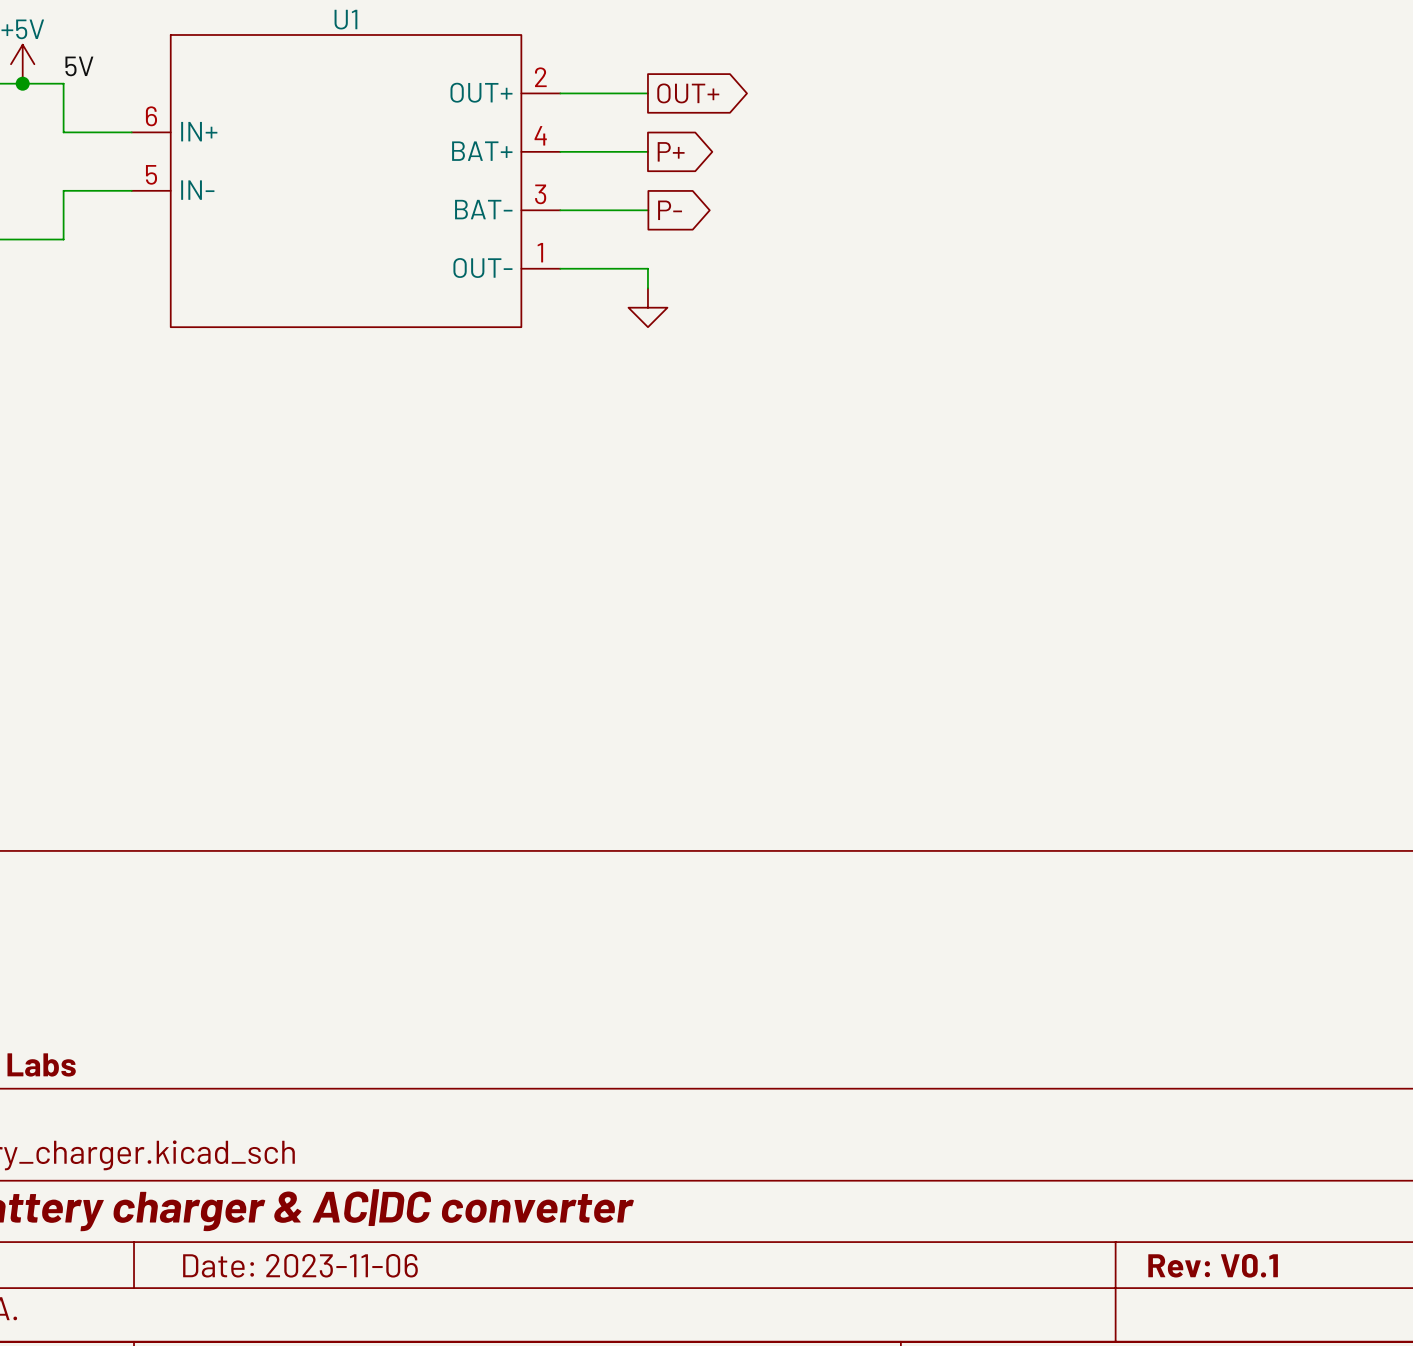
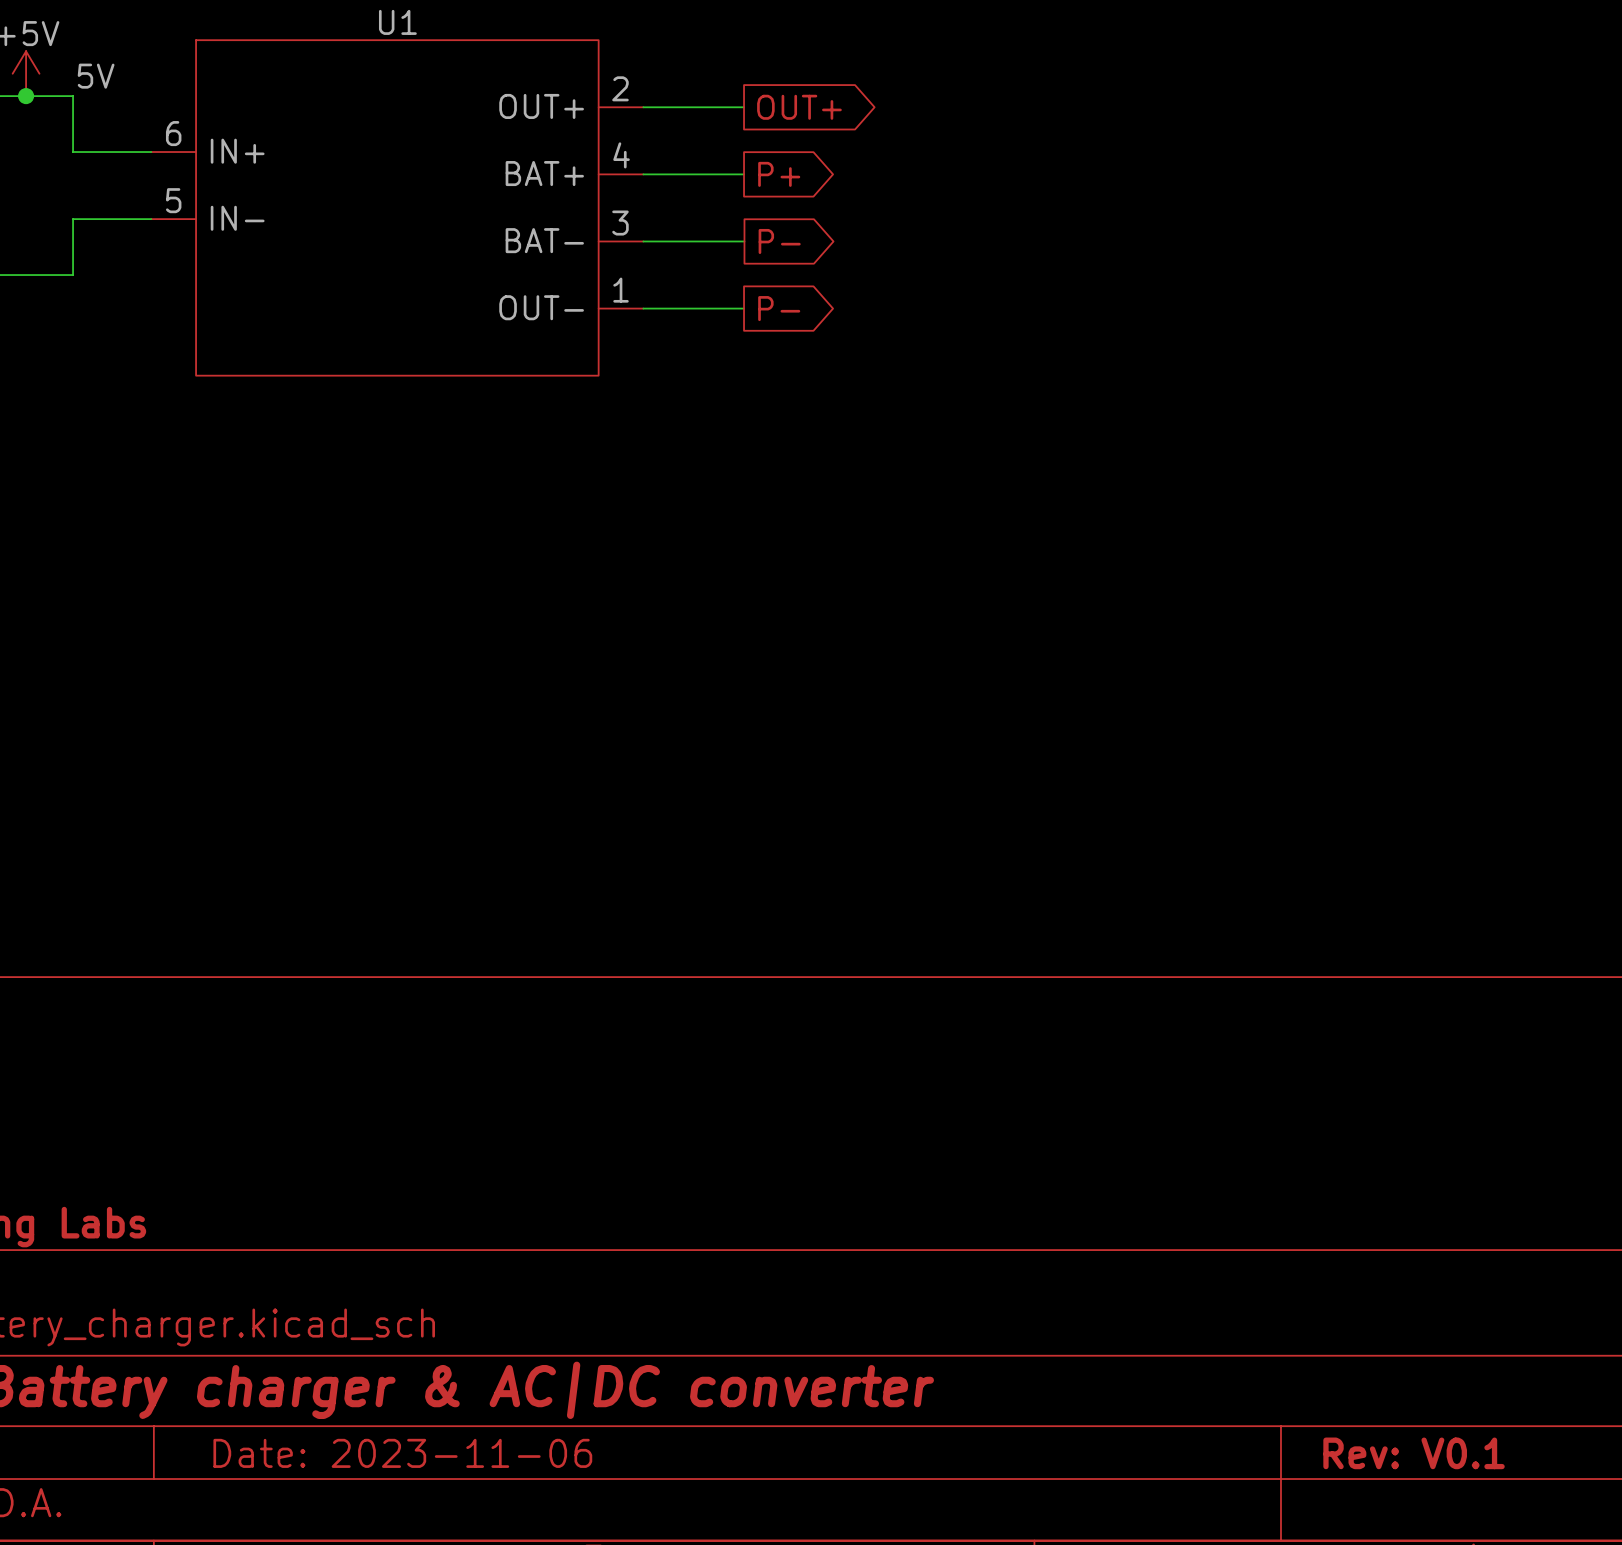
global label: none -> P- (779, 308)
power symbol: (647, 307) -> none

